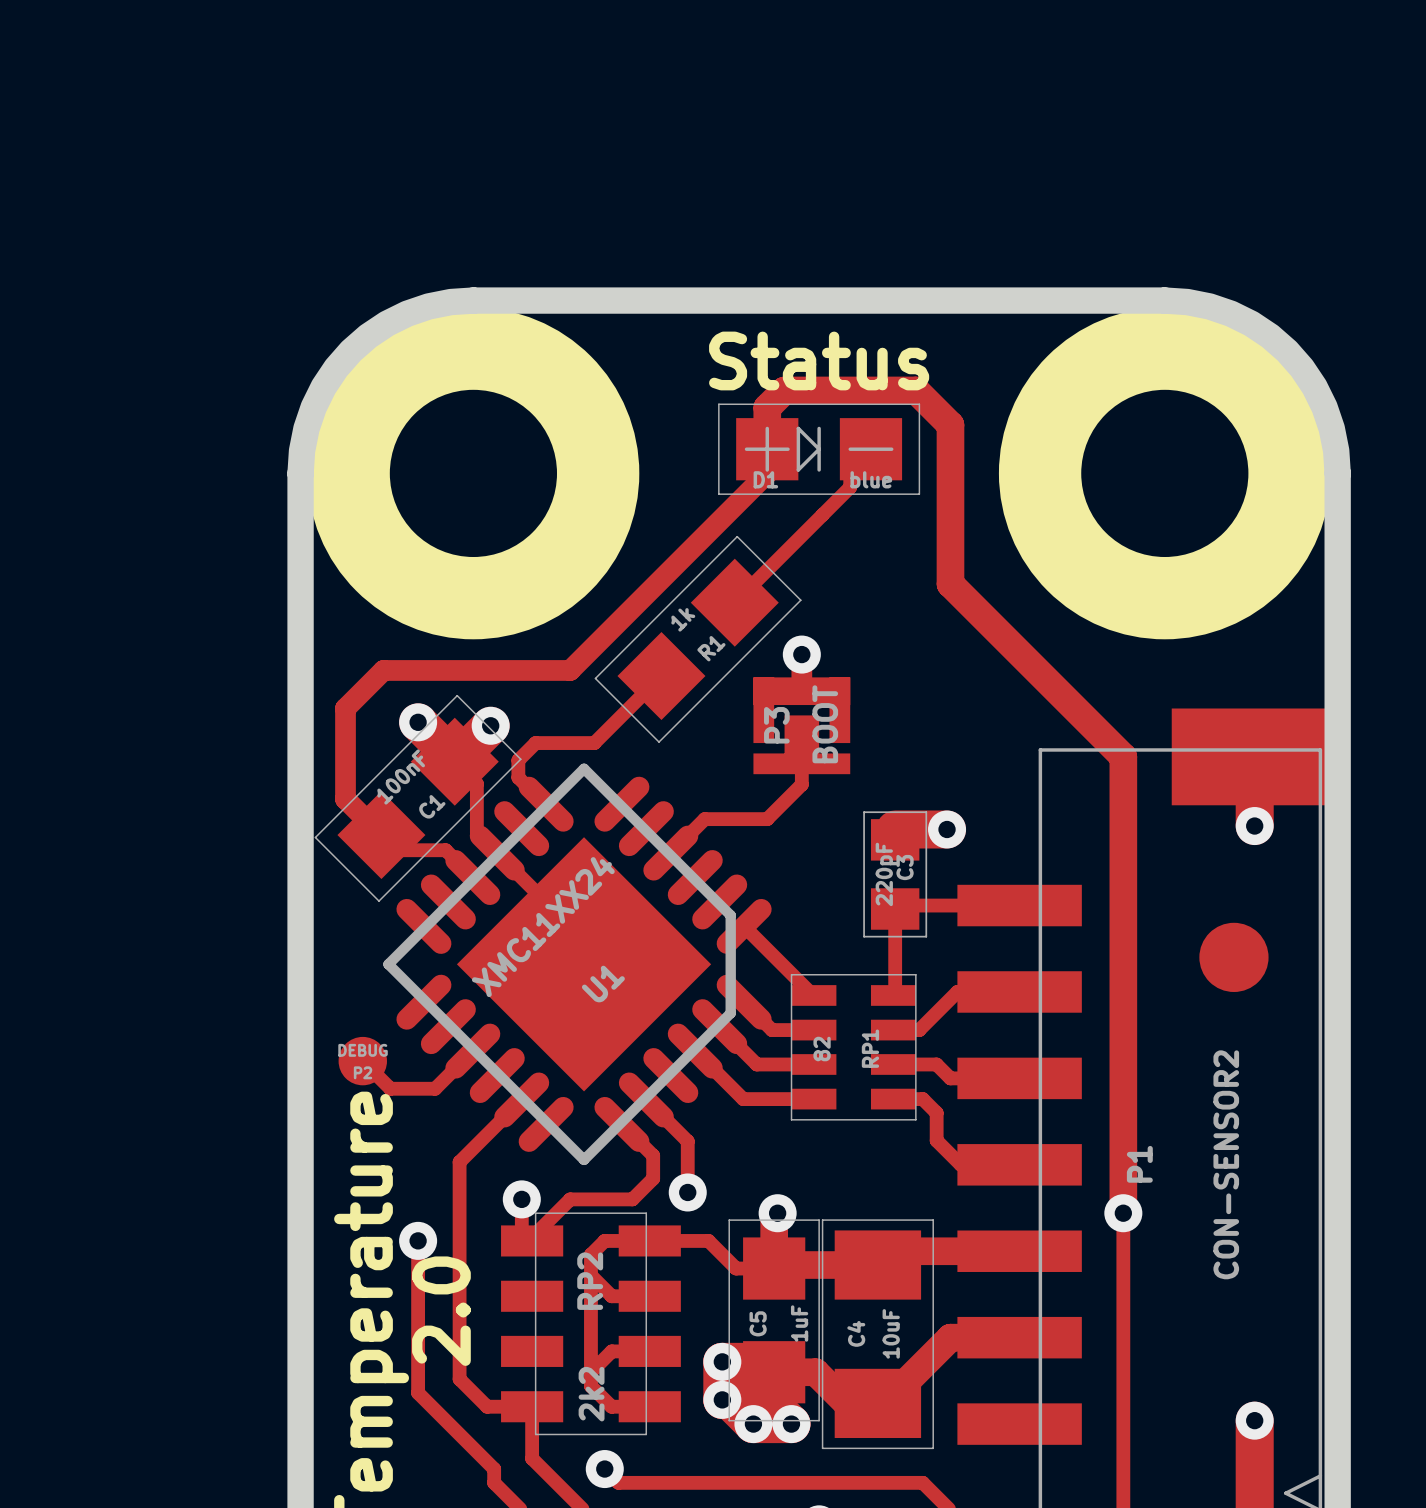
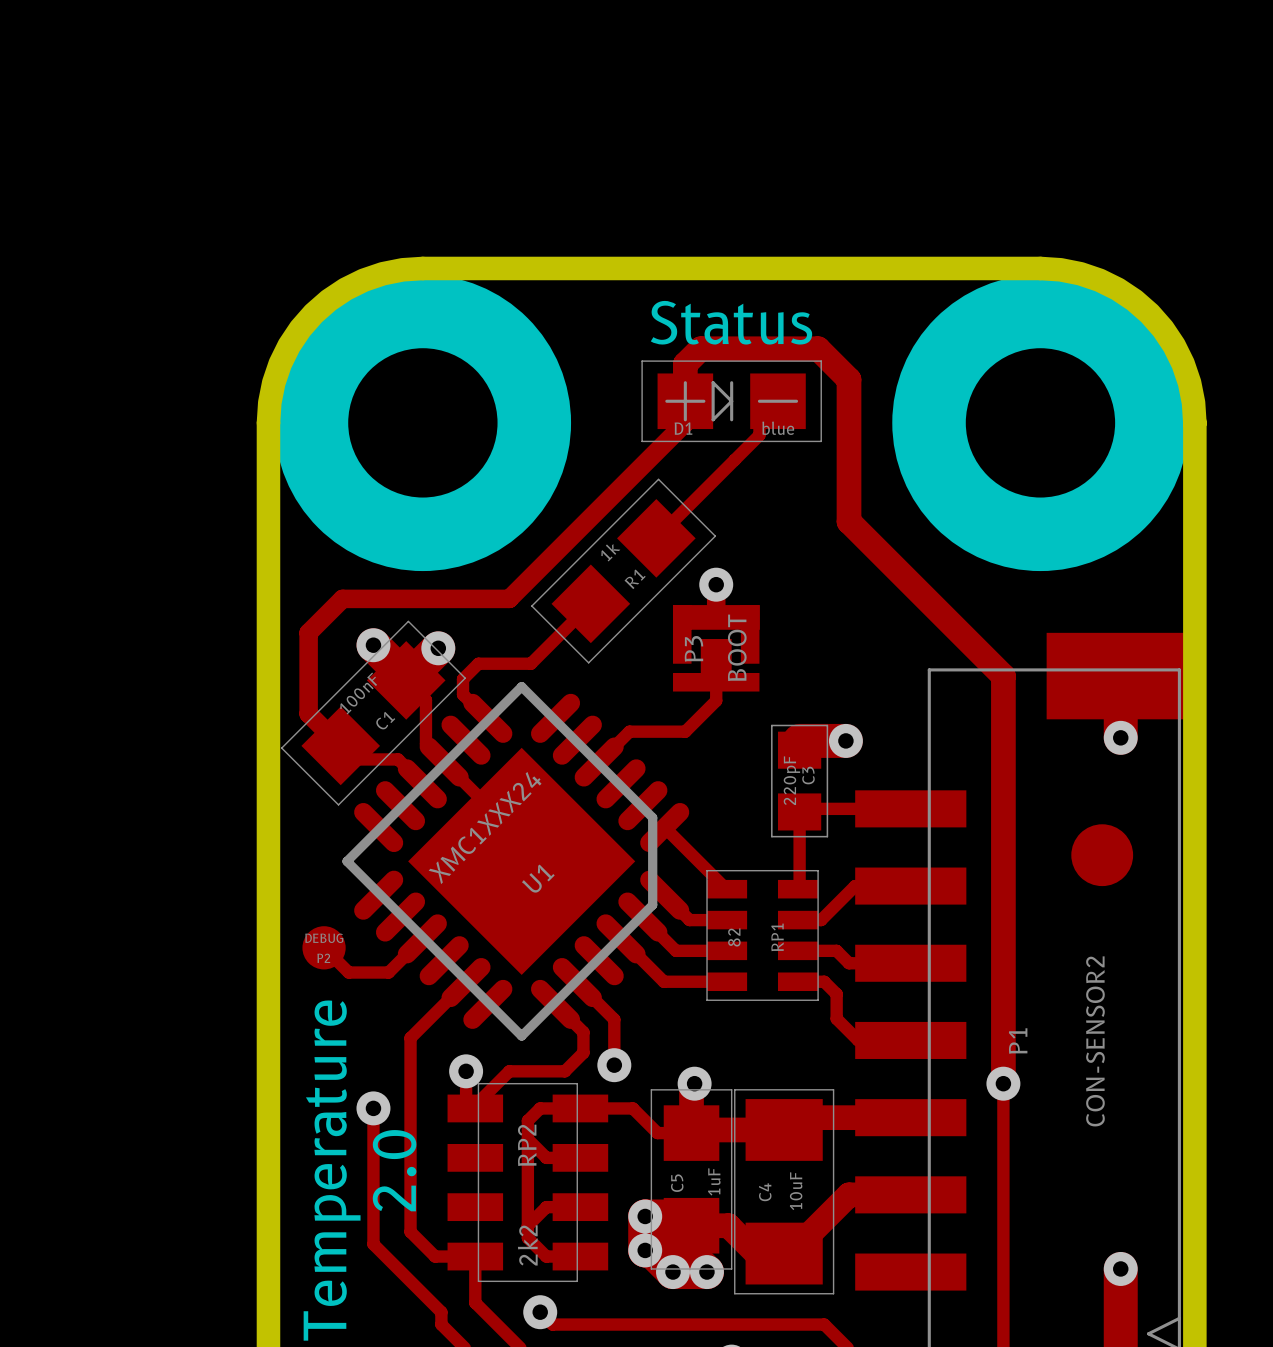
U1 value: XMC11XX24 (543, 927) -> XMC1XXX24 (485, 828)

